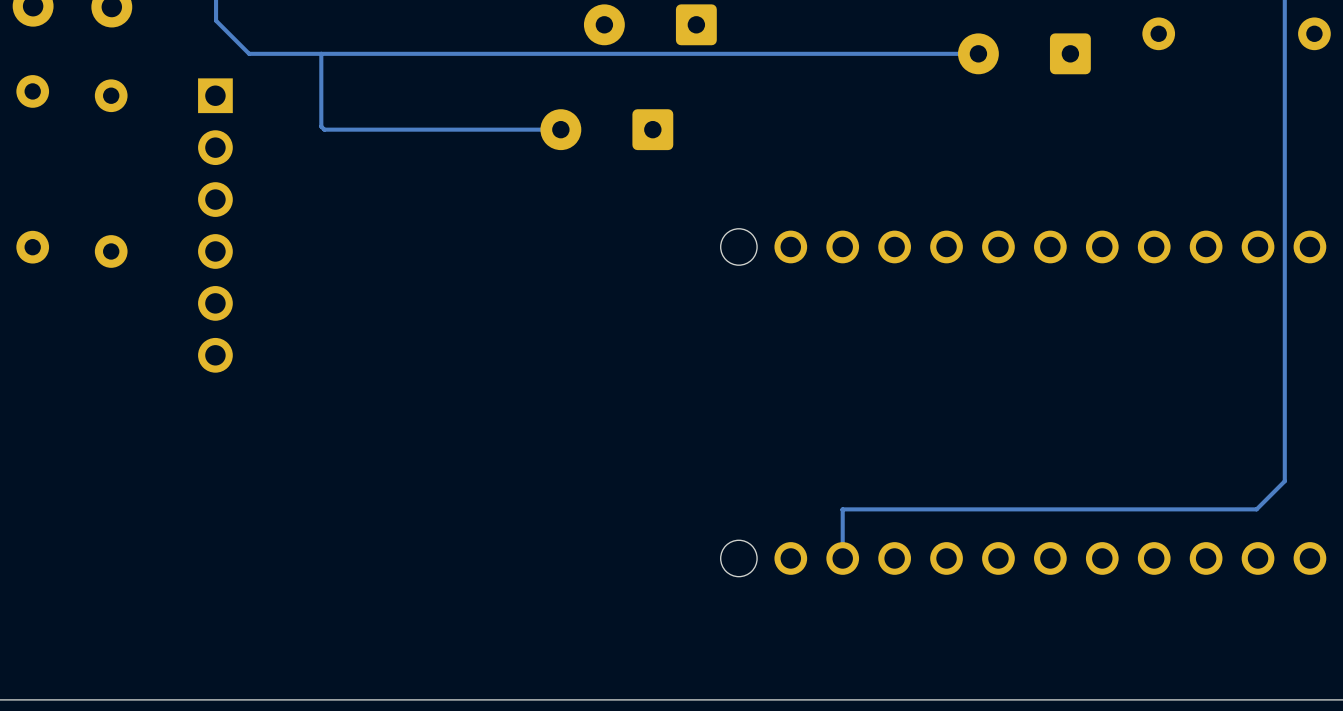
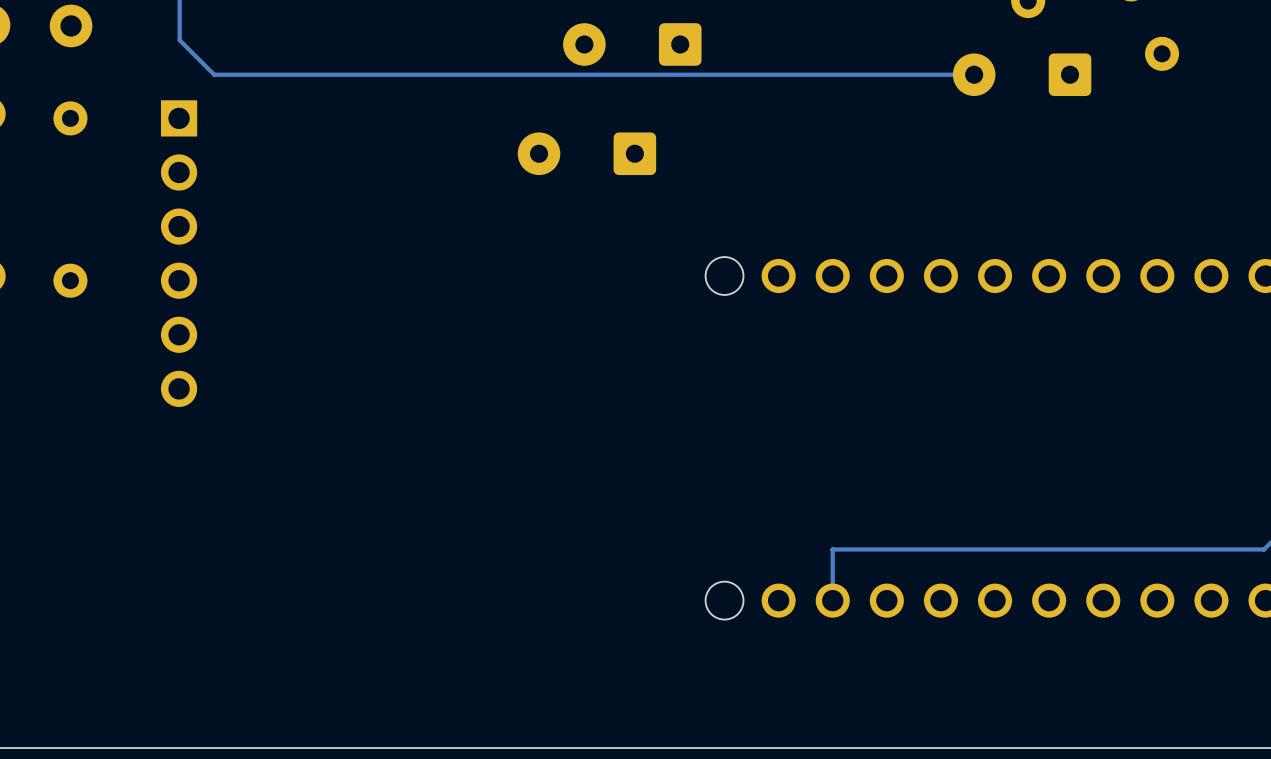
track: (321, 53) (321, 126) (324, 129) (560, 129) -> none

